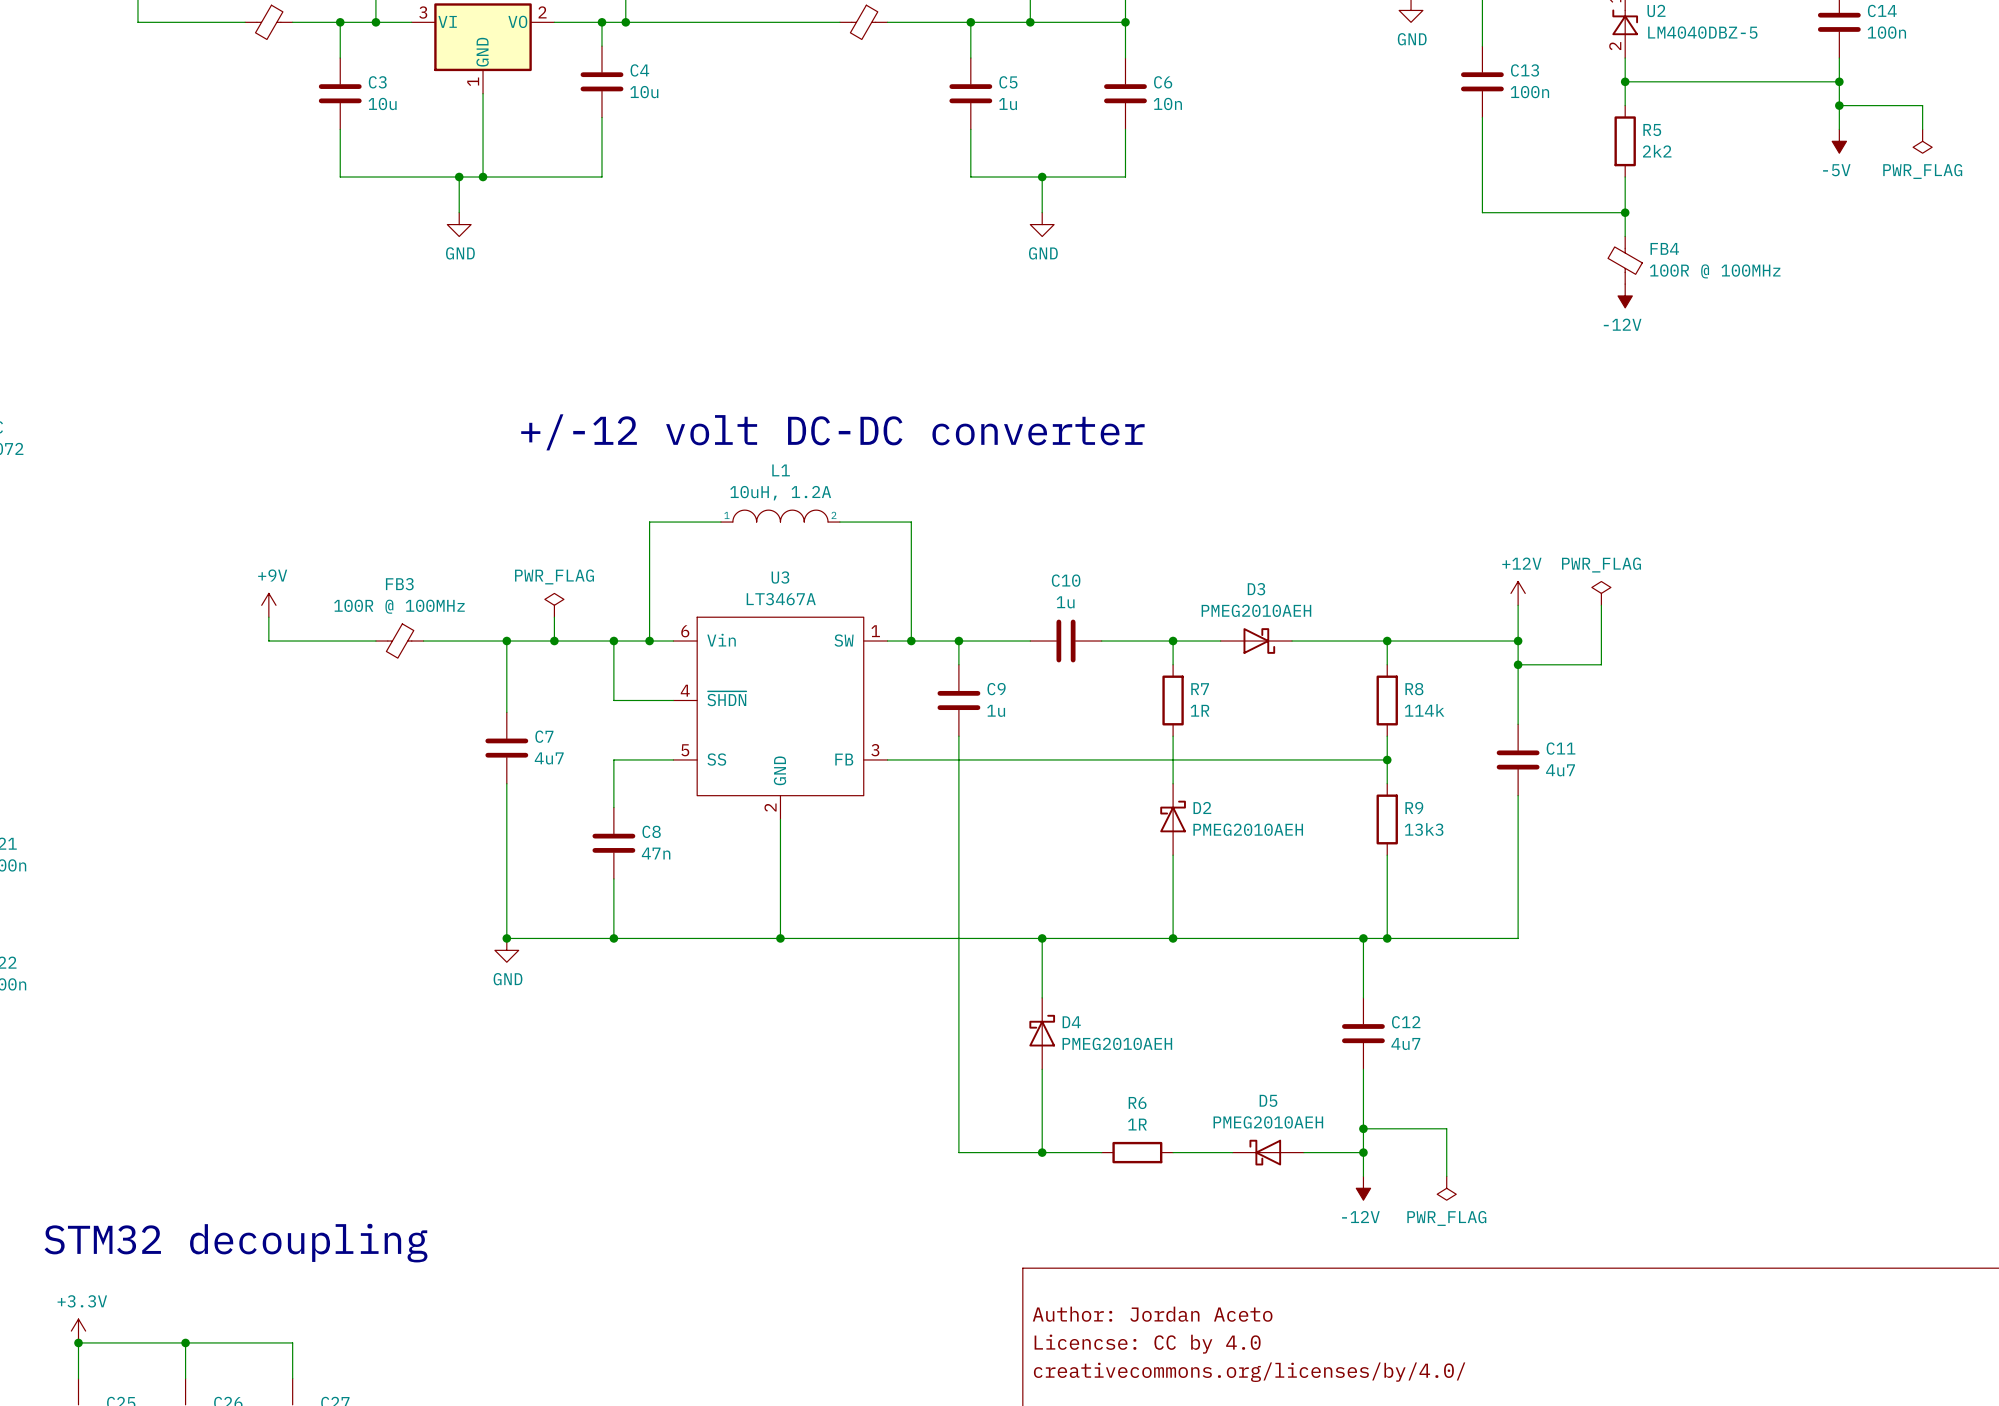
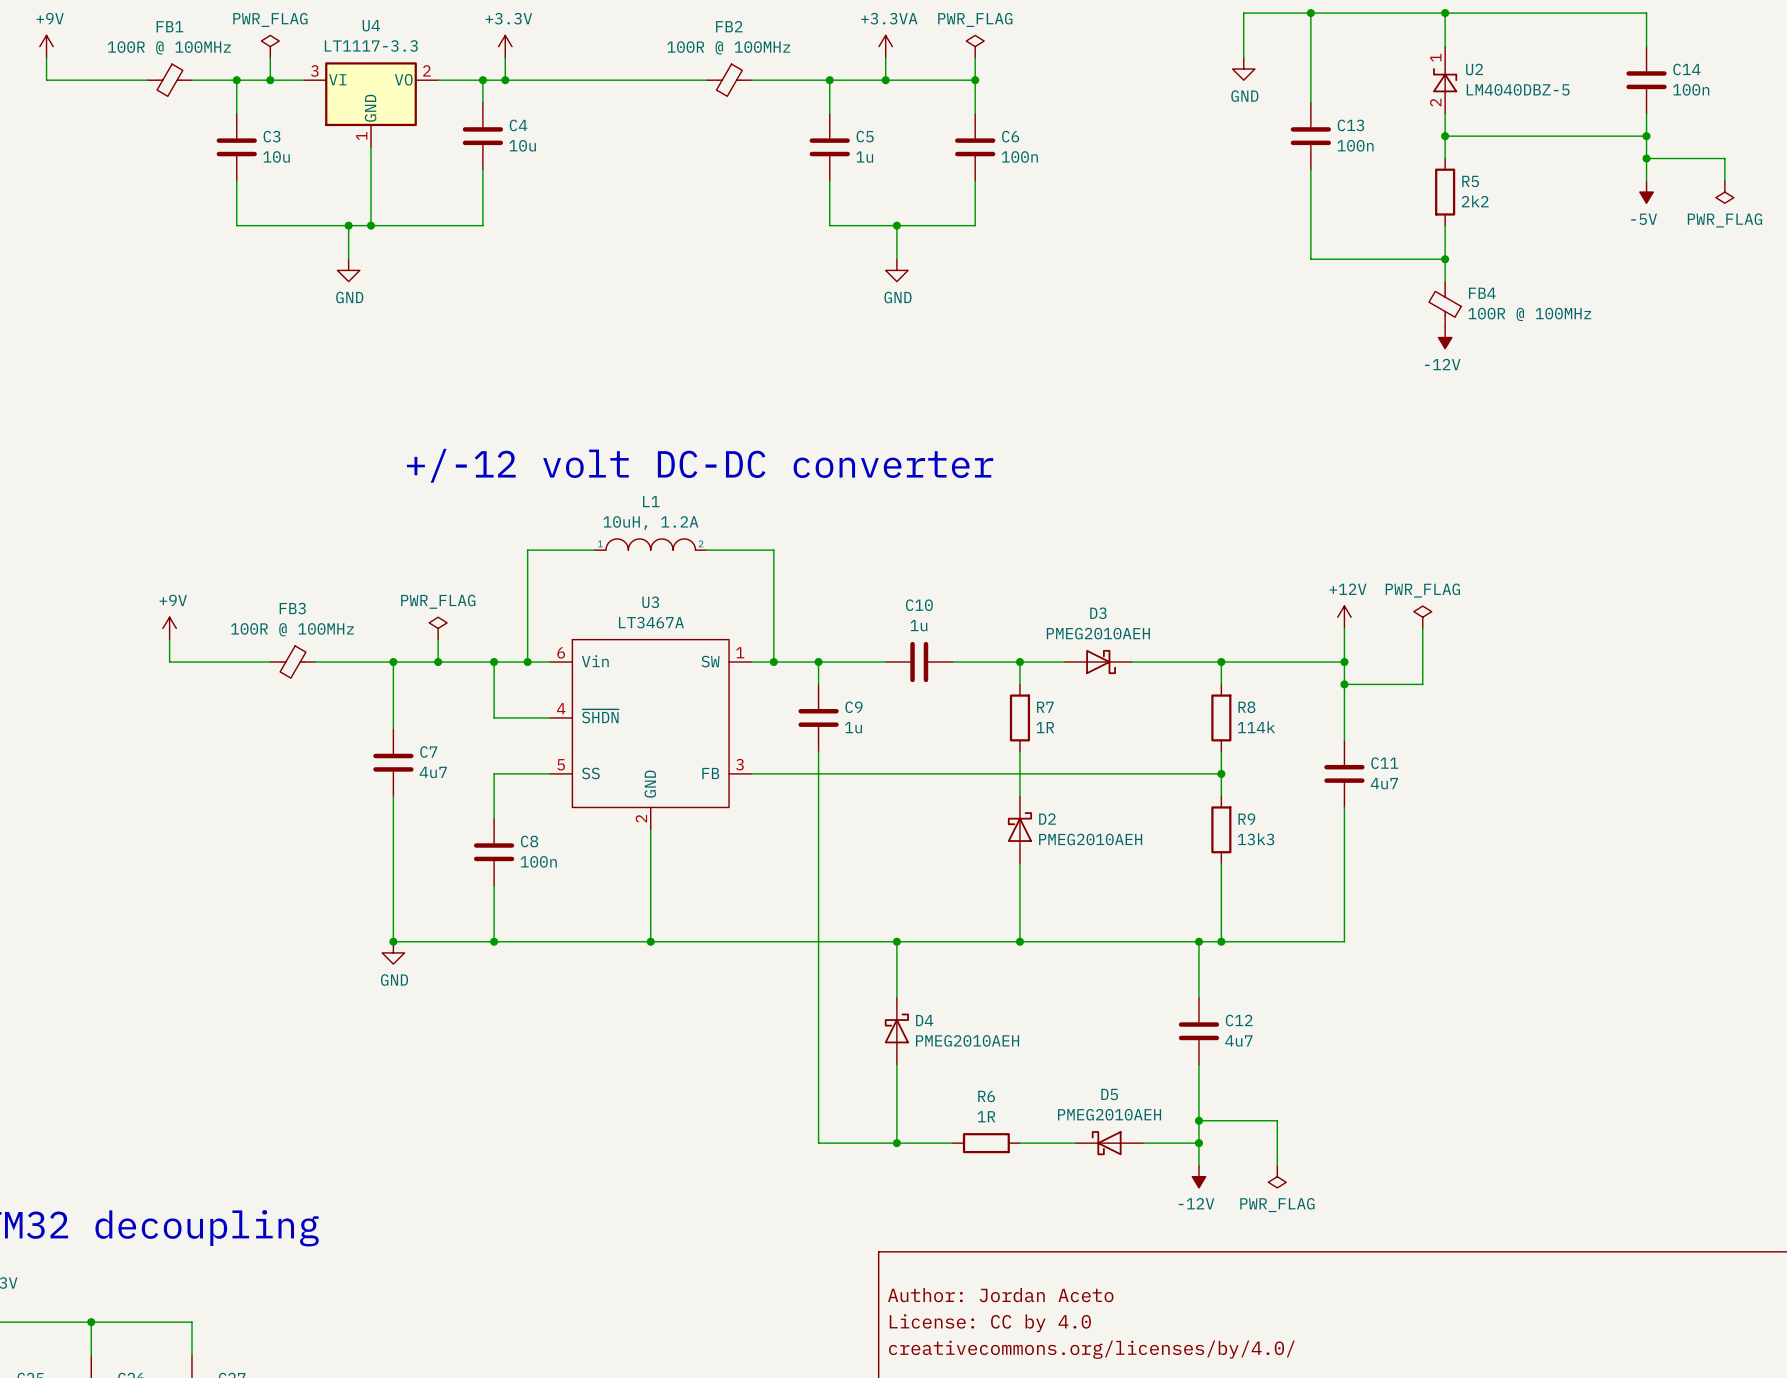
C6 value: 10n (1167, 103) -> 100n (1019, 156)
C8 value: 47n (656, 853) -> 100n (538, 861)
title block: Licencse: CC by 4.0 (1147, 1344) -> License: CC by 4.0 (990, 1323)

